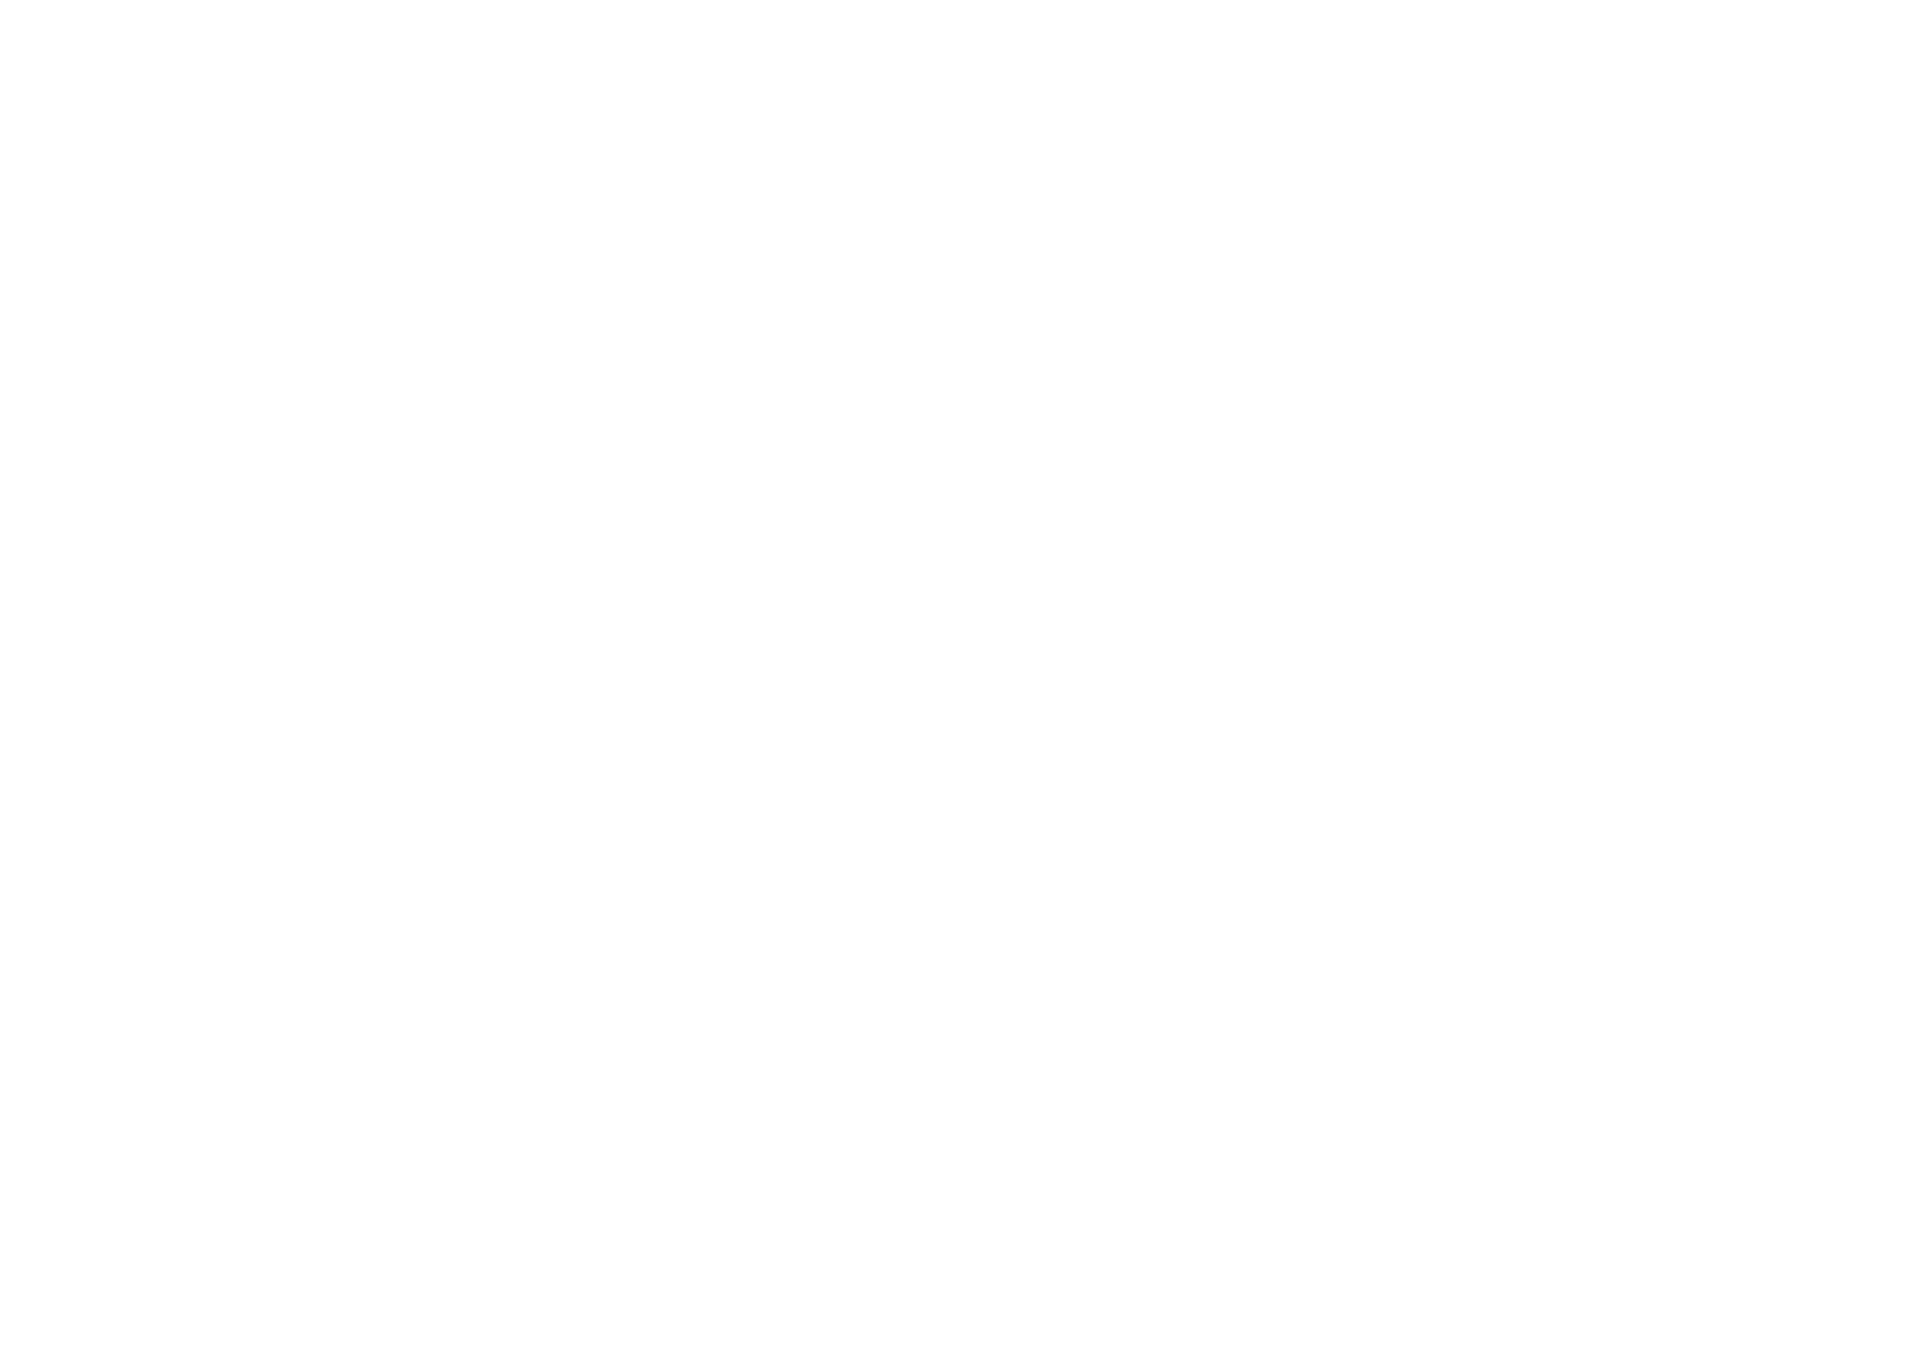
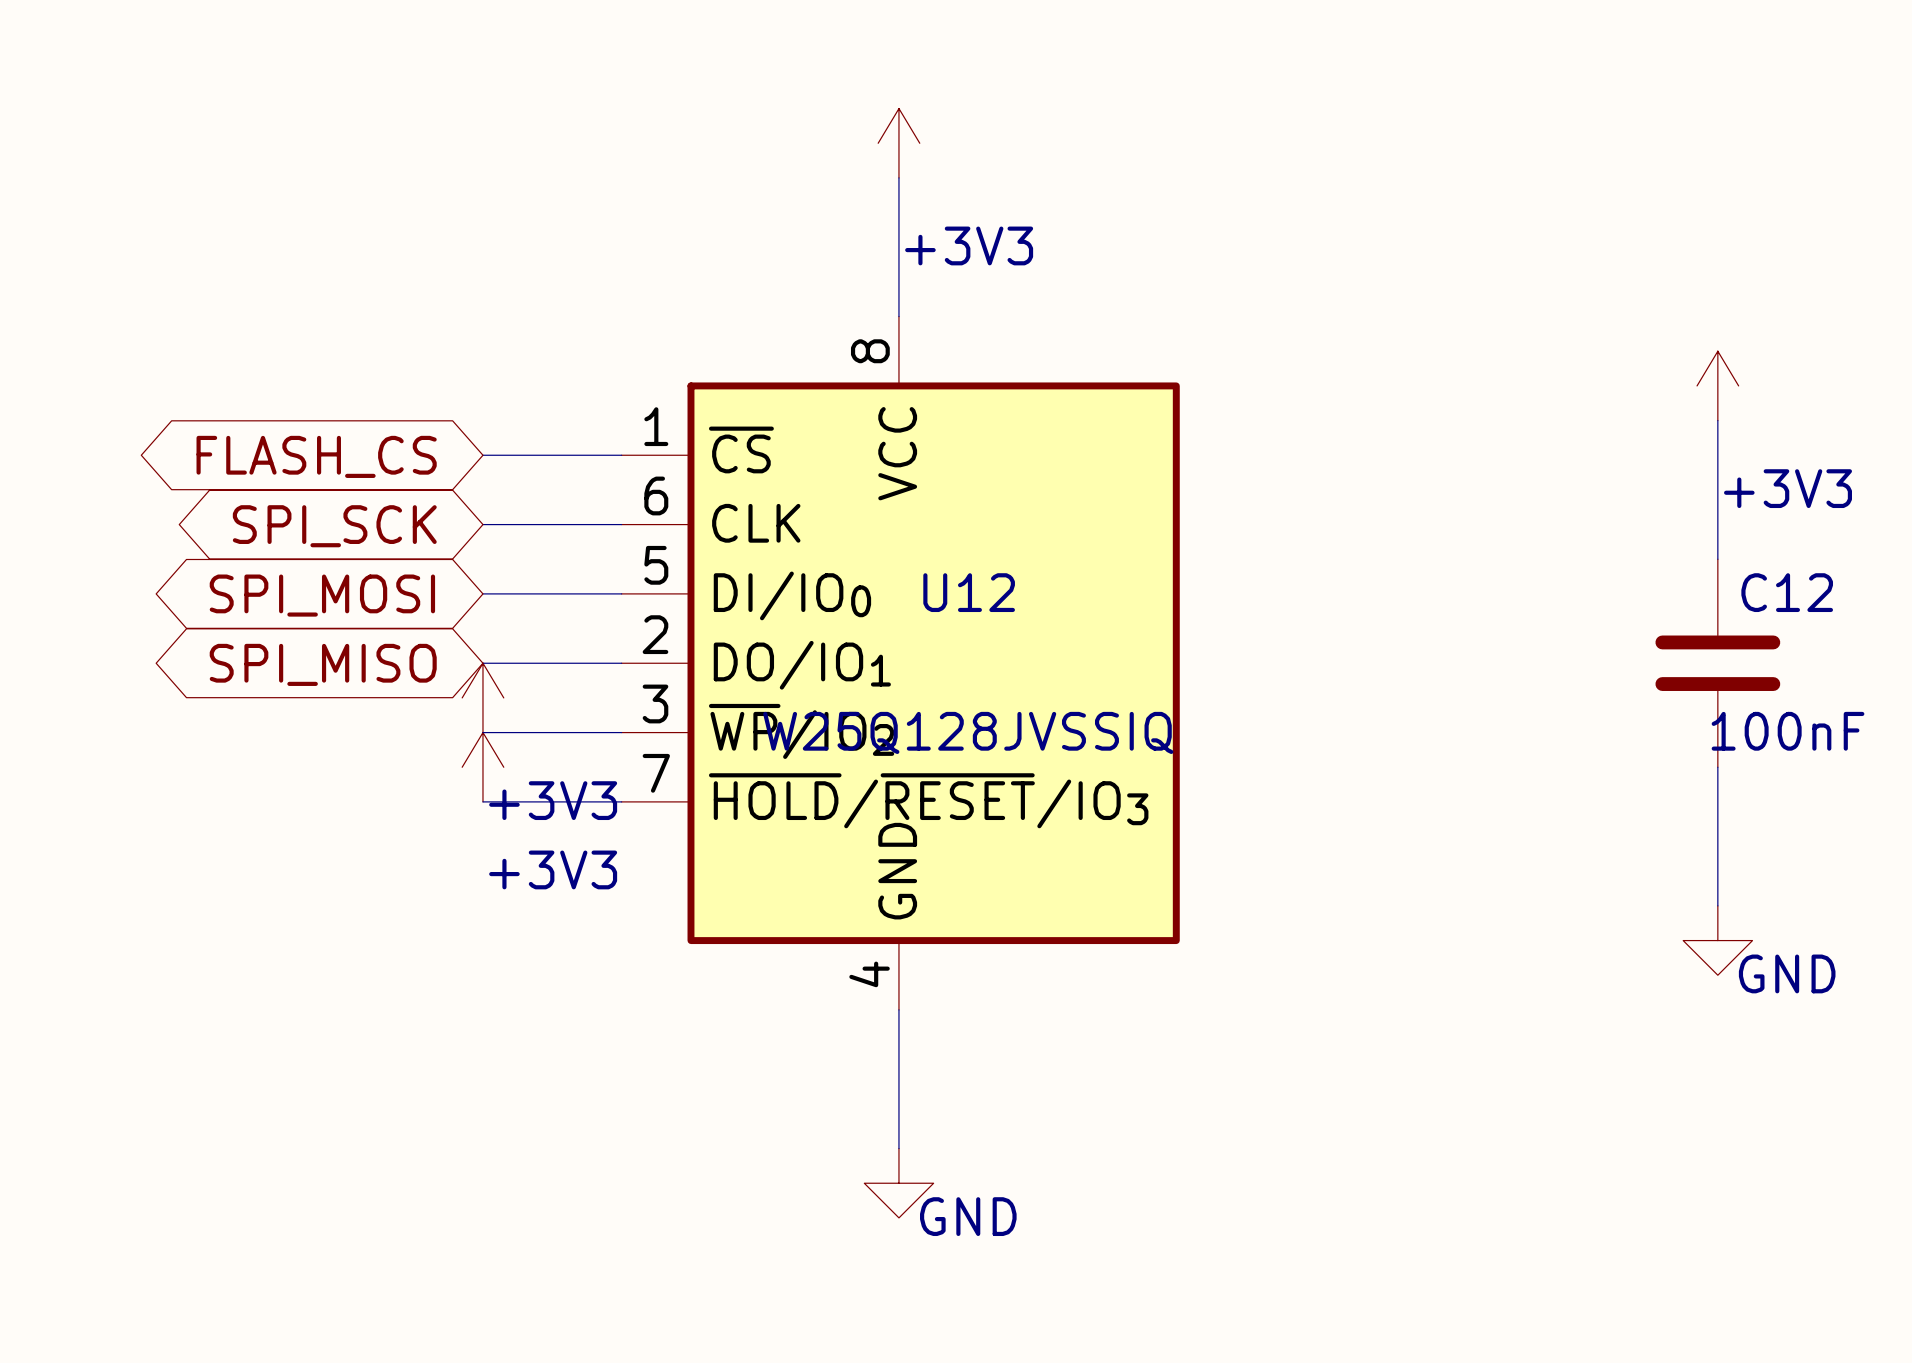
power symbol: none -> +3V3 (898, 143)
wire: none -> (898, 177) (898, 316)
power symbol: none -> +3V3 (1717, 385)
wire: none -> (1717, 420) (1717, 559)
wire: none -> (482, 455) (621, 455)
global label: none -> FLASH_CS (316, 456)
wire: none -> (482, 524) (621, 524)
global label: none -> SPI_SCK (334, 526)
wire: none -> (482, 593) (621, 593)
global label: none -> SPI_MOSI (322, 595)
wire: none -> (482, 663) (621, 663)
U12: none -> W25Q128JVSSIQ (900, 663)
C12: none -> 100nF (1717, 663)
global label: none -> SPI_MISO (323, 664)
power symbol: none -> +3V3 (482, 697)
wire: none -> (482, 732) (621, 732)
power symbol: none -> +3V3 (482, 767)
wire: none -> (1717, 767) (1717, 905)
wire: none -> (482, 801) (621, 801)
power symbol: none -> GND (1717, 940)
wire: none -> (898, 1009) (898, 1148)
power symbol: none -> GND (898, 1183)

